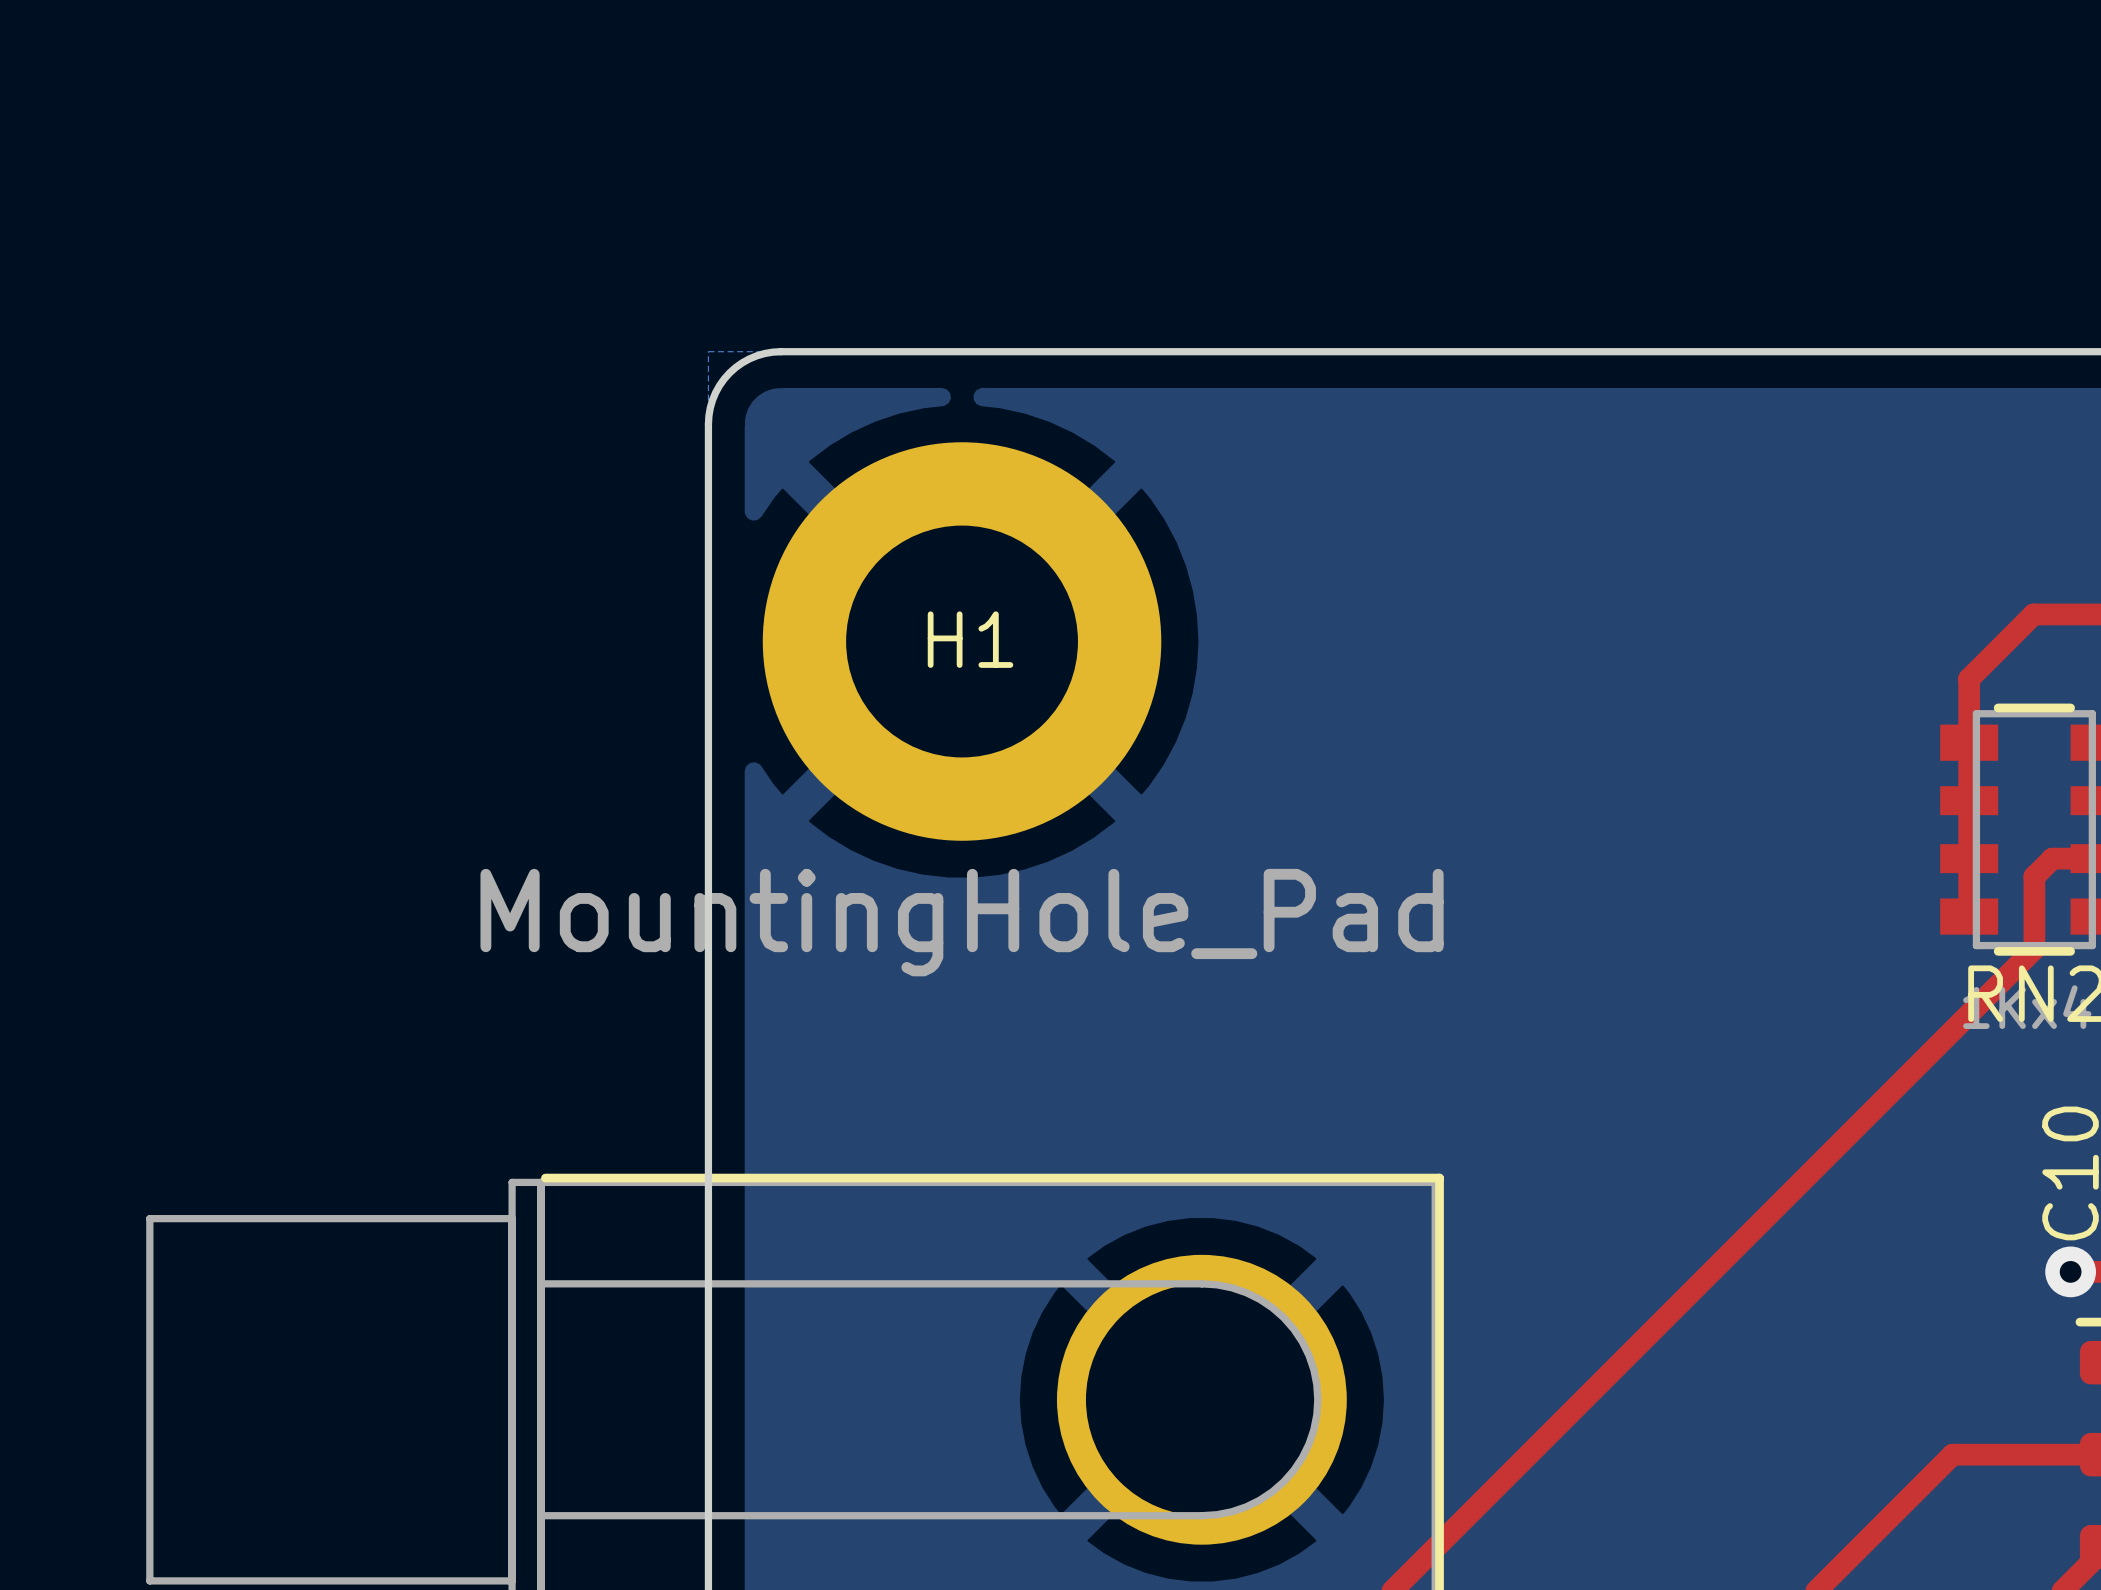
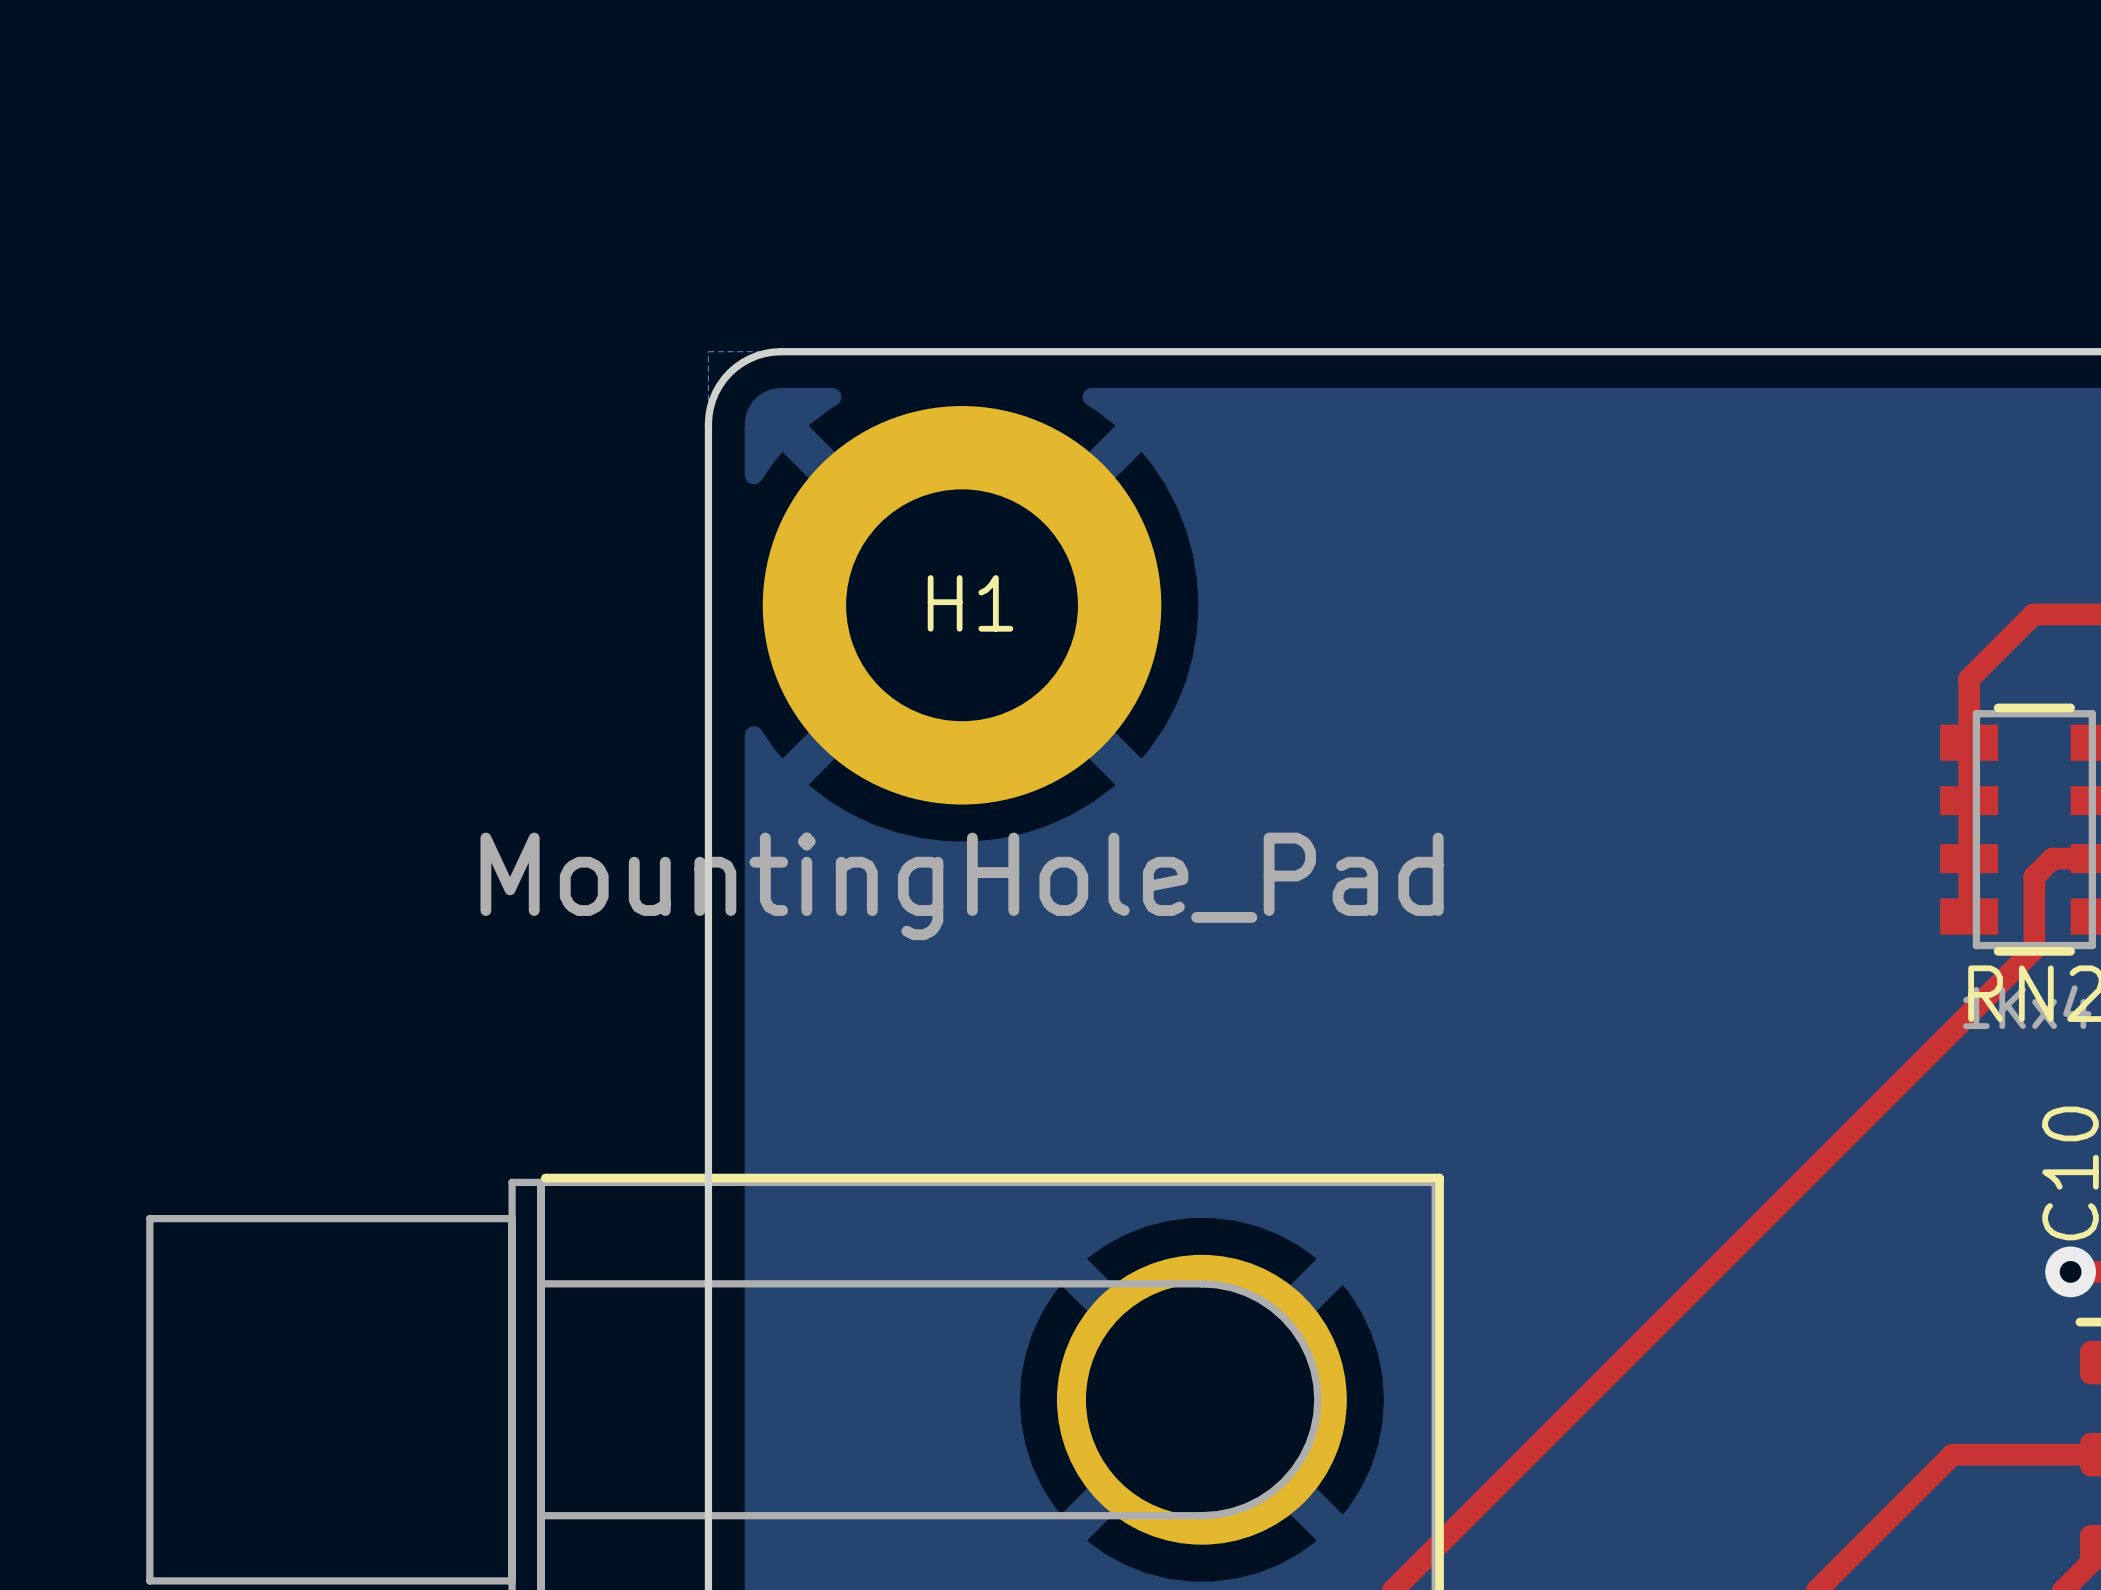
H1 position: (962, 641) -> (962, 605)

